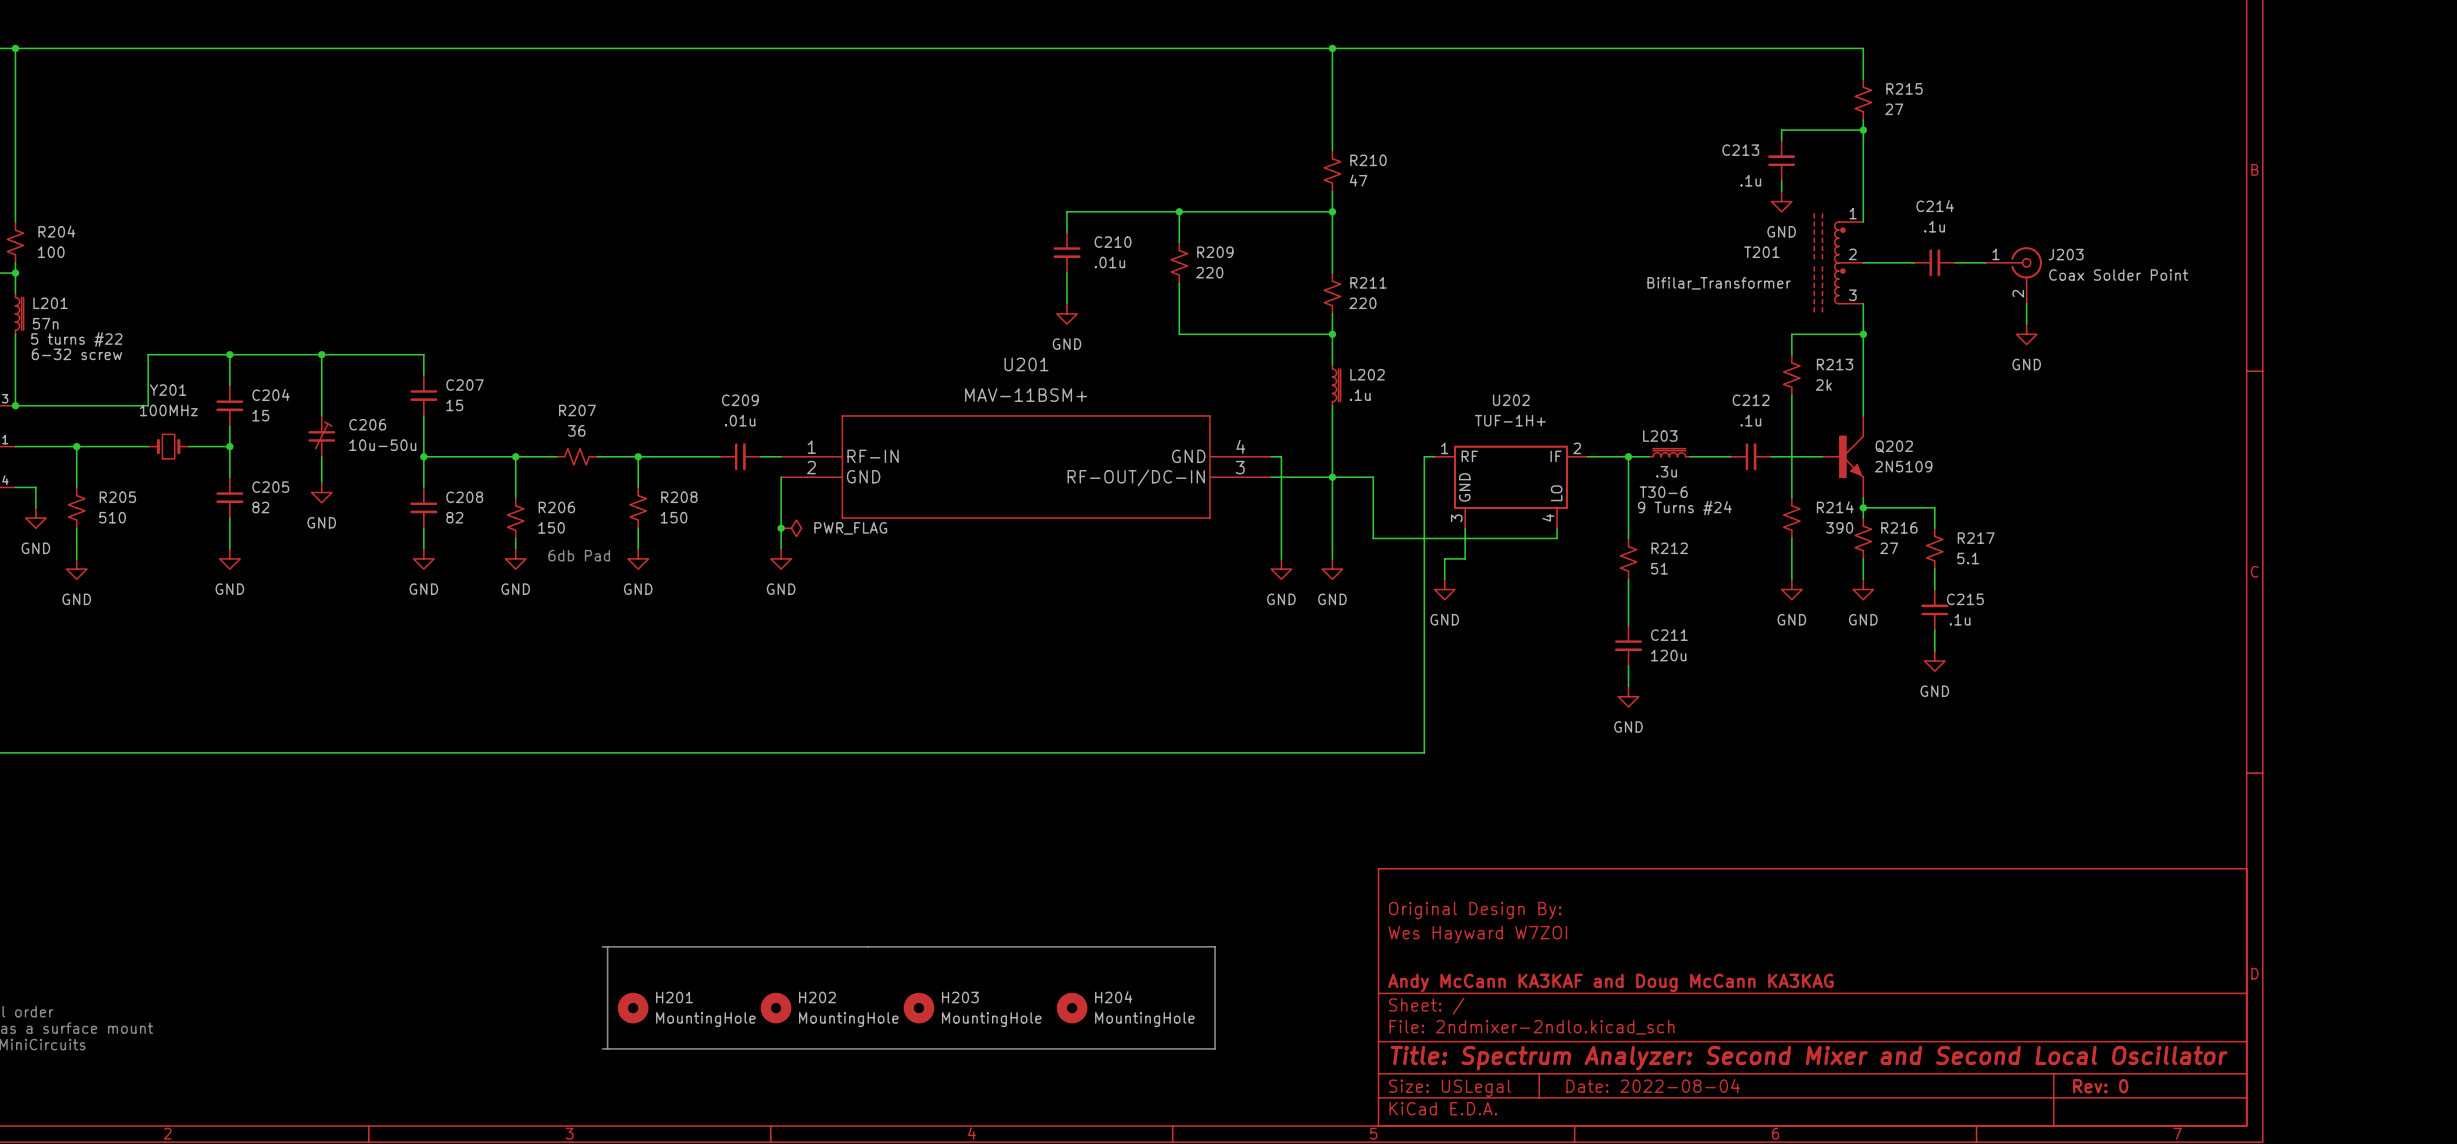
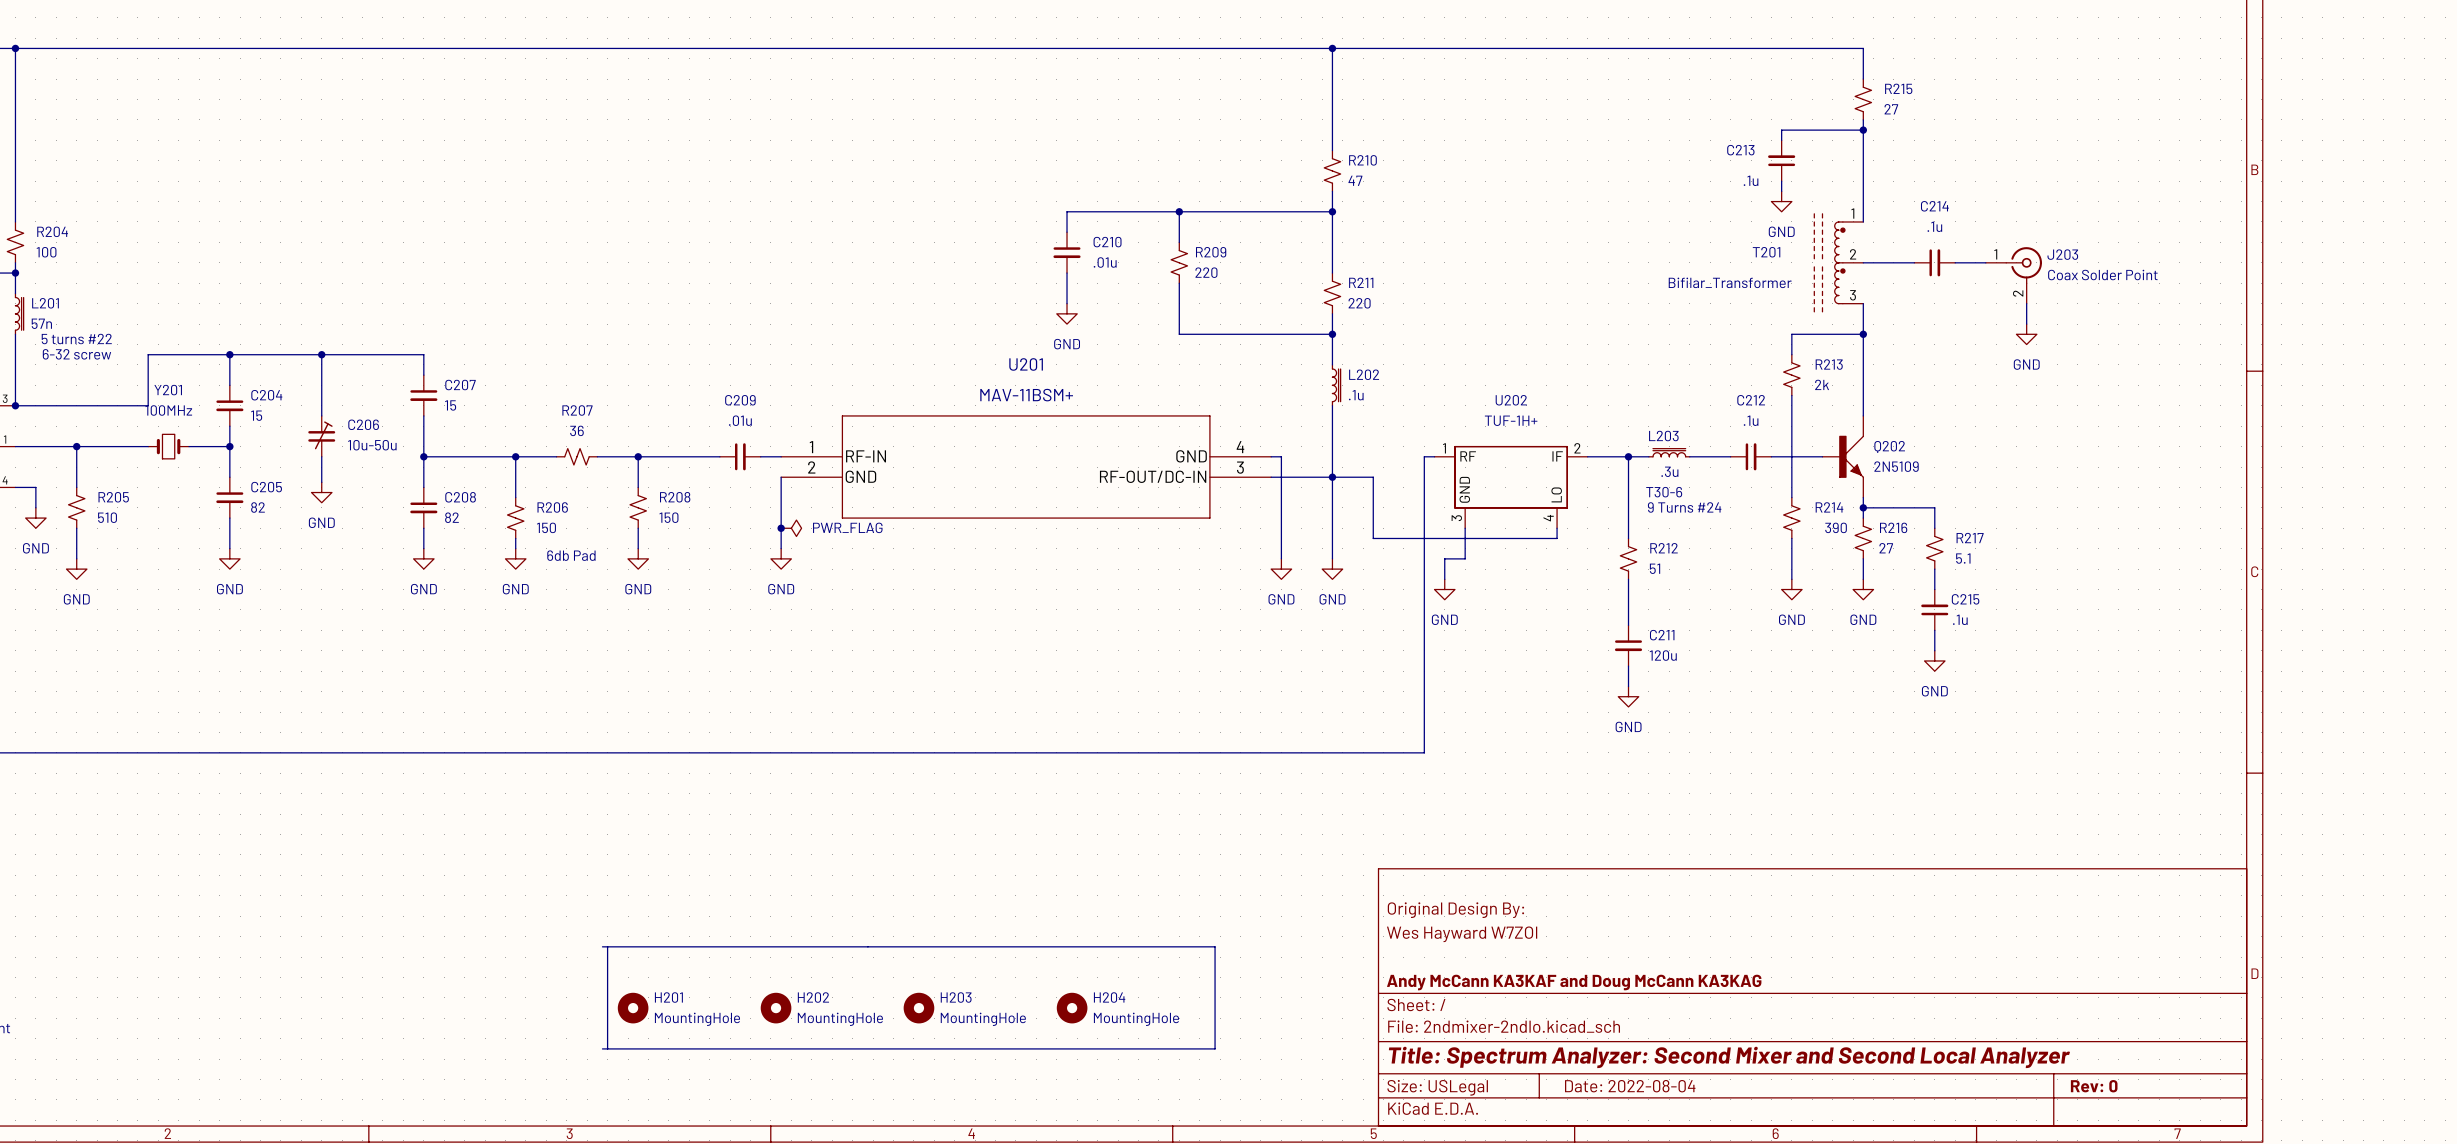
title block: Title: Spectrum Analyzer: Second Mixer and Second Local Oscillator (1809, 1058) -> Title: Spectrum Analyzer: Second Mixer and Second Local Analyzer (1729, 1057)

